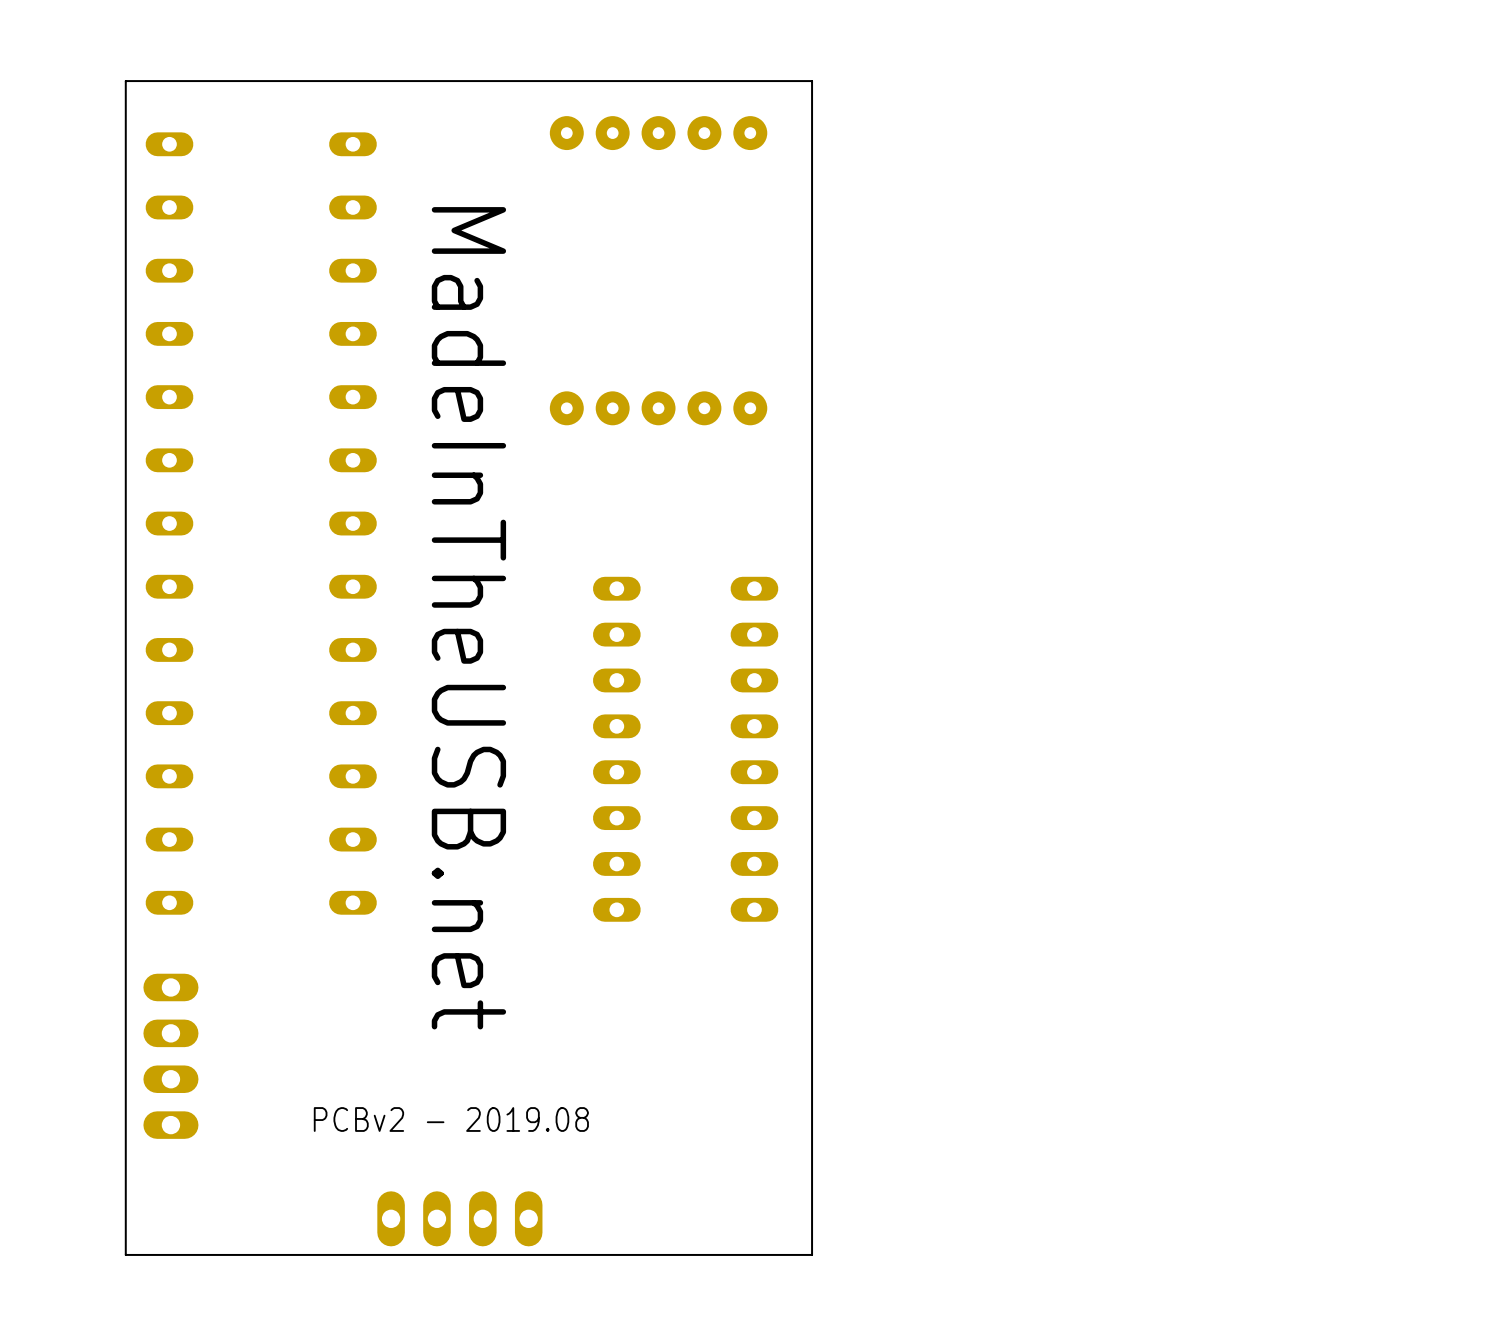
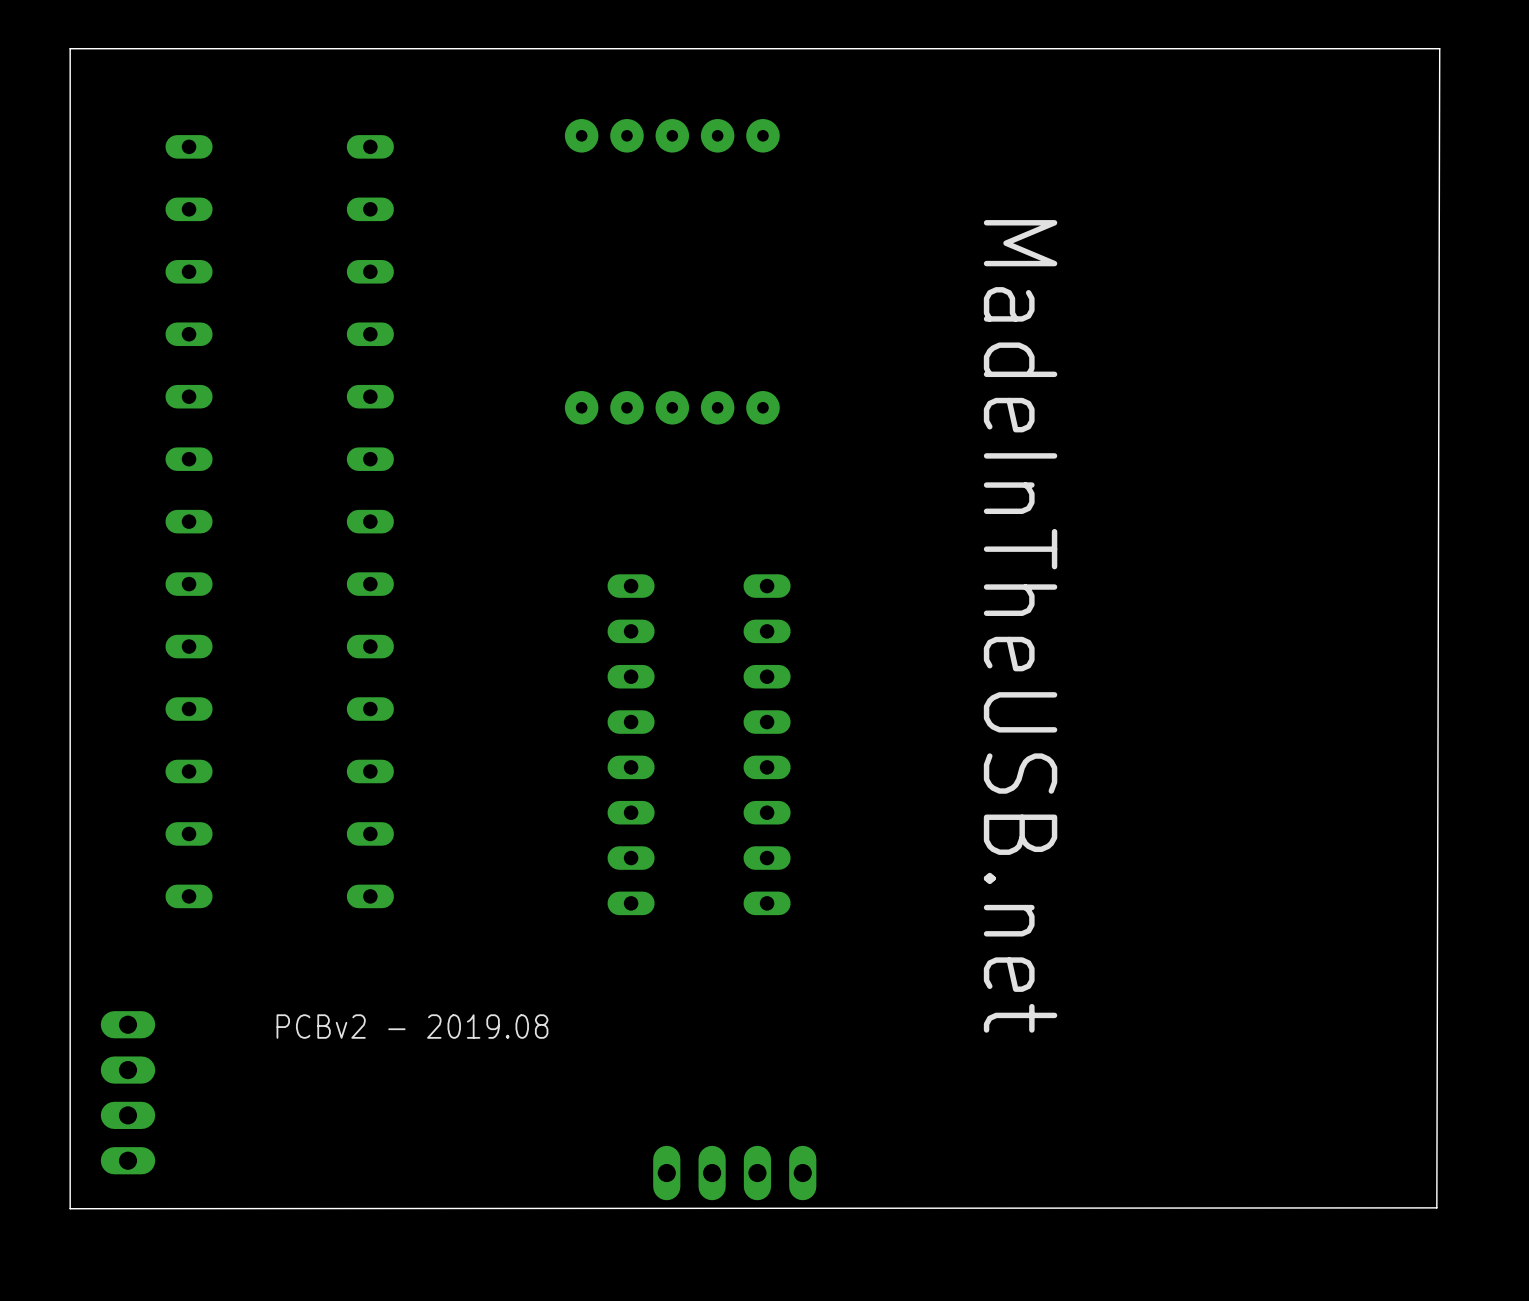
board edge: none -> (1439, 48) (70, 48) (70, 1208) (1436, 1207) (1439, 48)
board edge: (812, 81) (125, 81) (125, 1254) (812, 1254) (812, 81) -> none
text: MadeInTheUSB.net (468, 618) -> none
text: none -> MadeInTheUSB.net (1020, 626)
part position: (170, 1056) -> (128, 1092)
text position: PCBv2 - 2019.08 (451, 1119) -> PCBv2 - 2019.08 (412, 1026)
part: none -> (734, 1173)
part: (459, 1218) -> none

